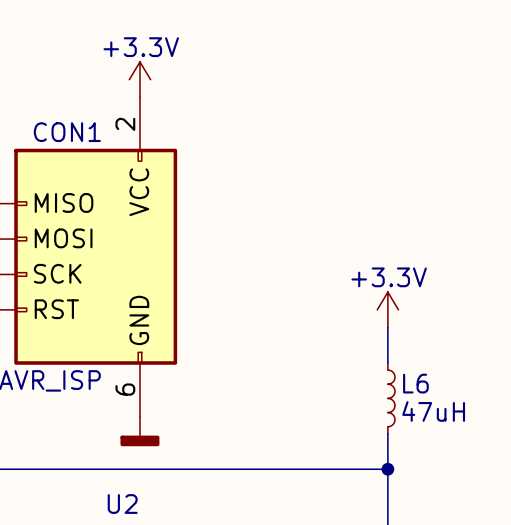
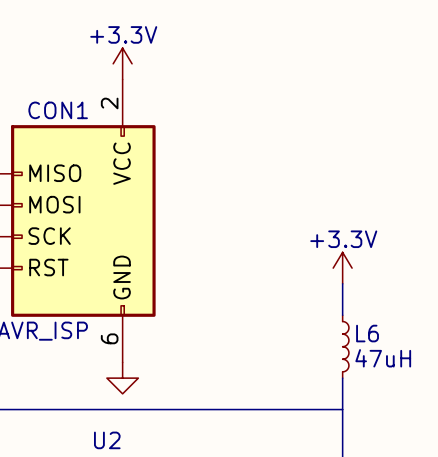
power symbol shape: [120, 416, 160, 447] -> [106, 362, 139, 394]
junction: (387, 469) -> none

